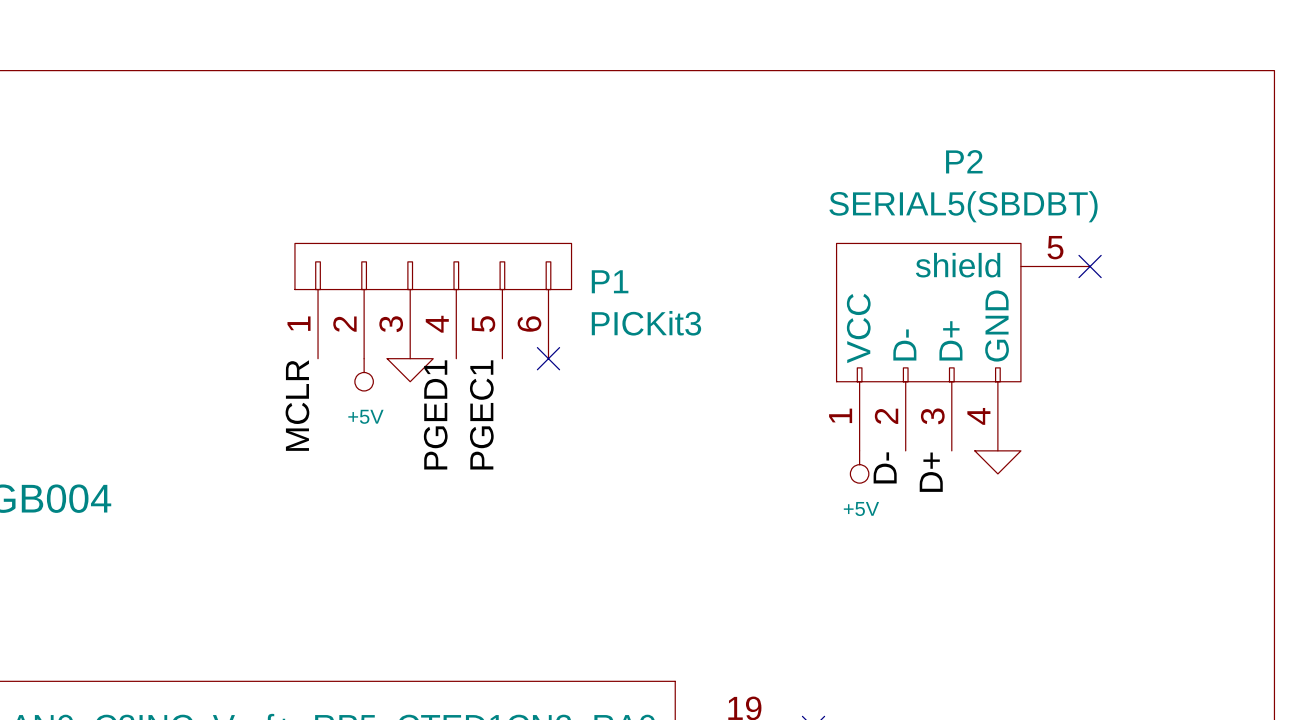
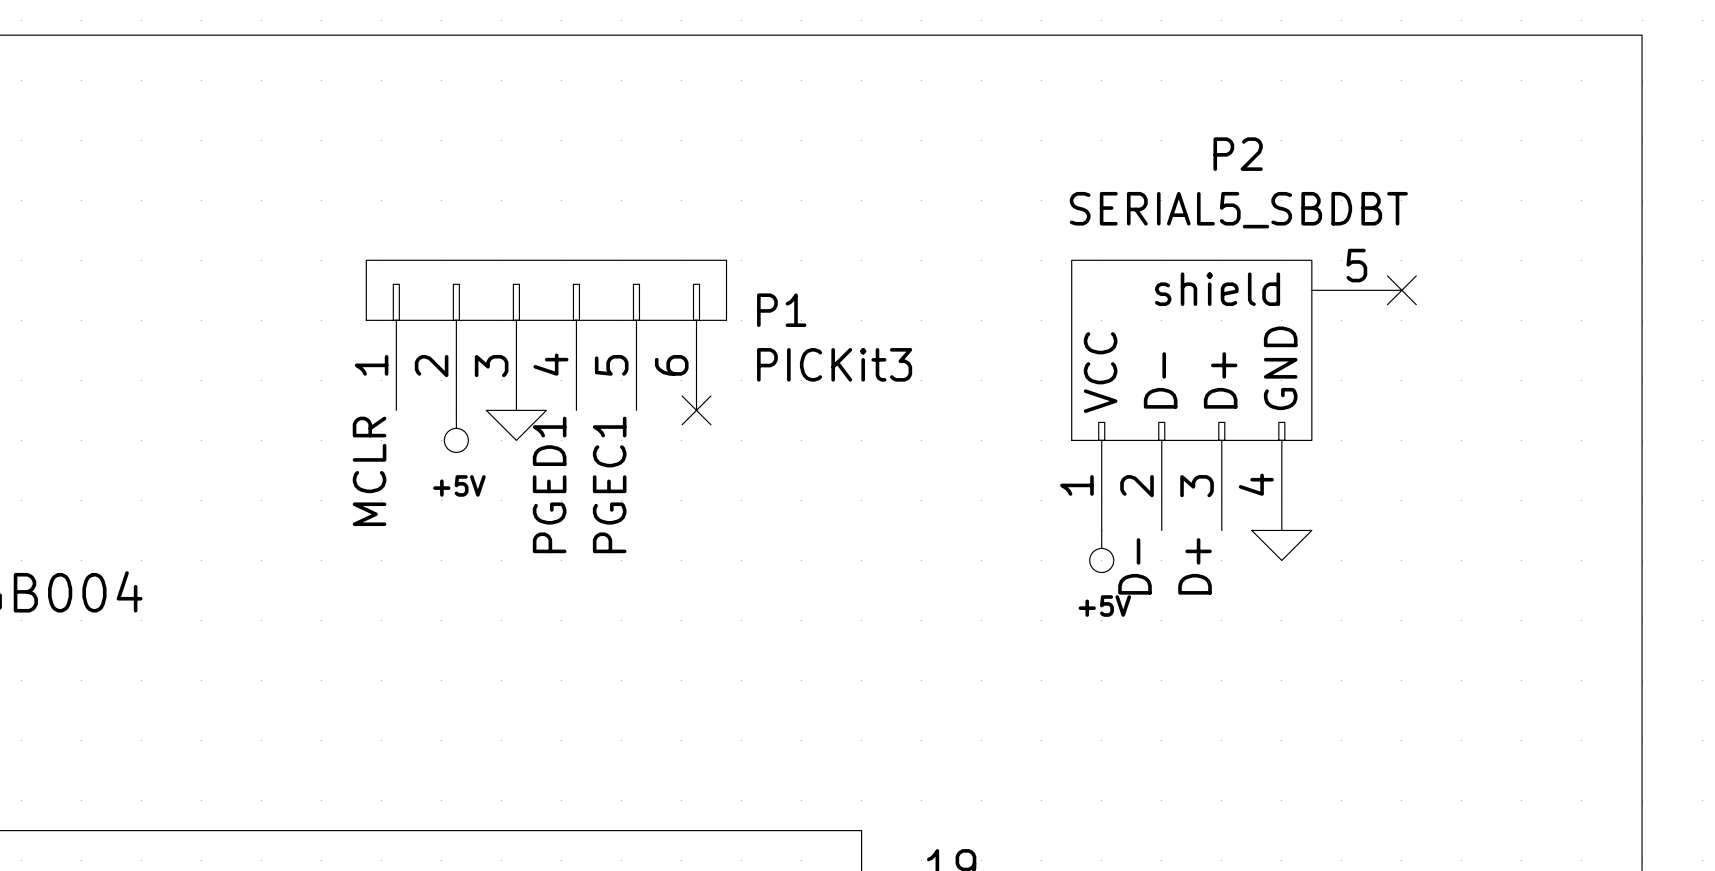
P2 value: SERIAL5(SBDBT) (963, 206) -> SERIAL5_SBDBT (1238, 210)

